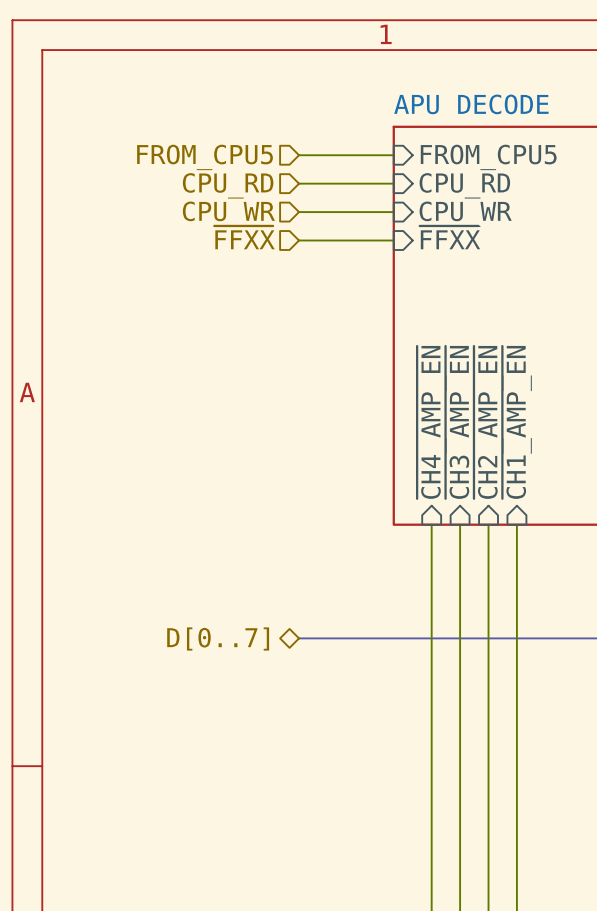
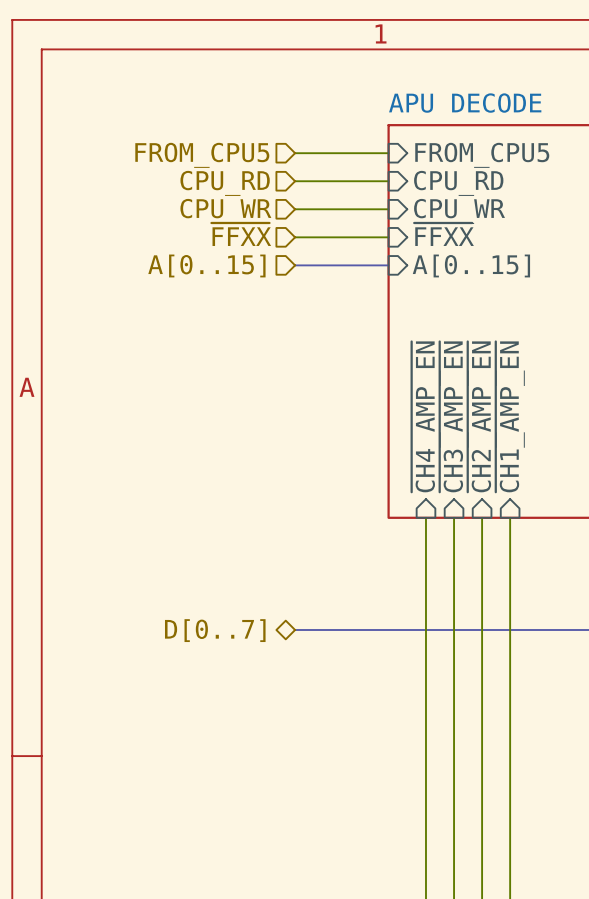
bus: none -> (295, 265) (388, 265)
hierarchical label: none -> A[0..15] (206, 265)
sheet pin: none -> A[0..15] (471, 265)

